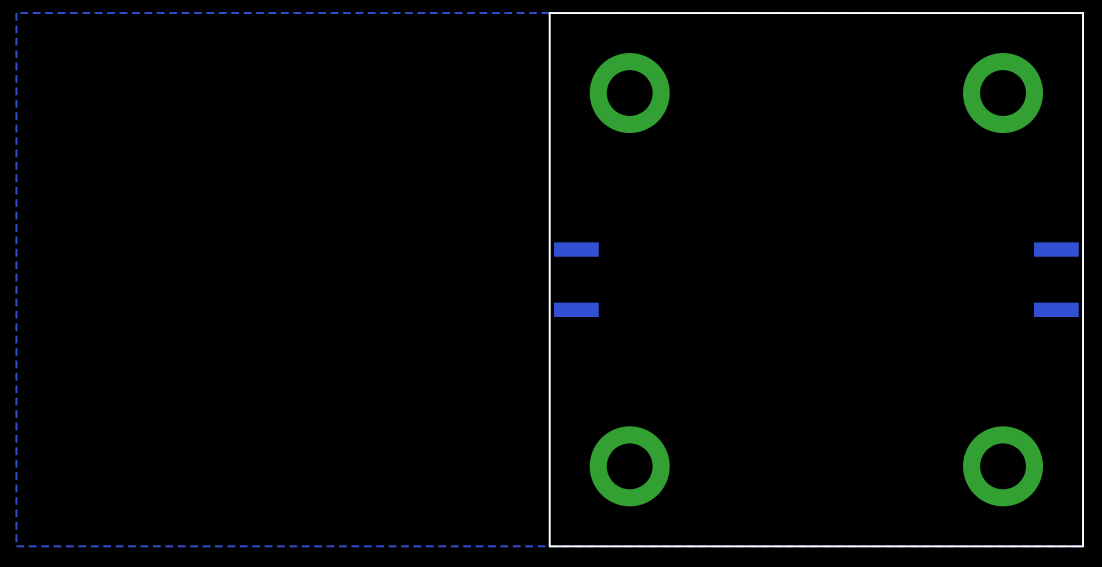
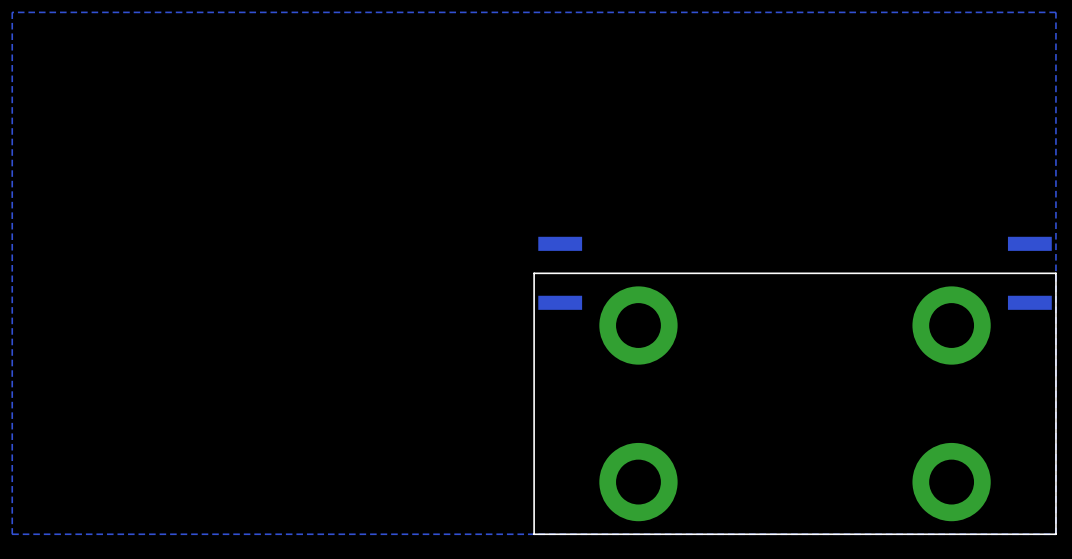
part: (629, 93) -> none
part: (1003, 93) -> none
board edge: (1083, 279) (1083, 13) (549, 13) (549, 279) -> (1055, 273) (534, 273)
part: none -> (638, 325)
part: none -> (951, 325)
part position: (629, 466) -> (638, 482)
part position: (1003, 466) -> (951, 482)

